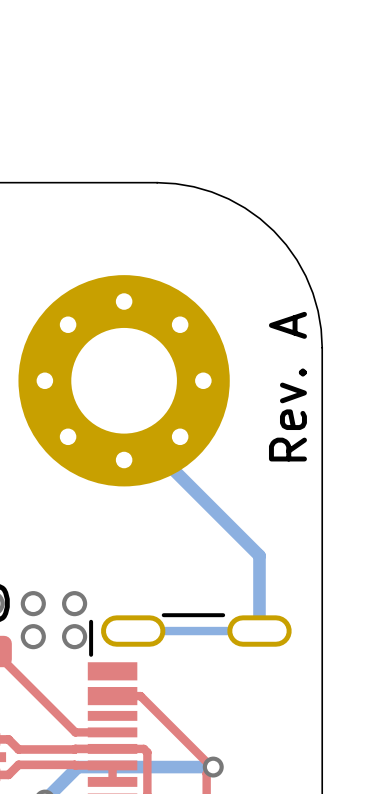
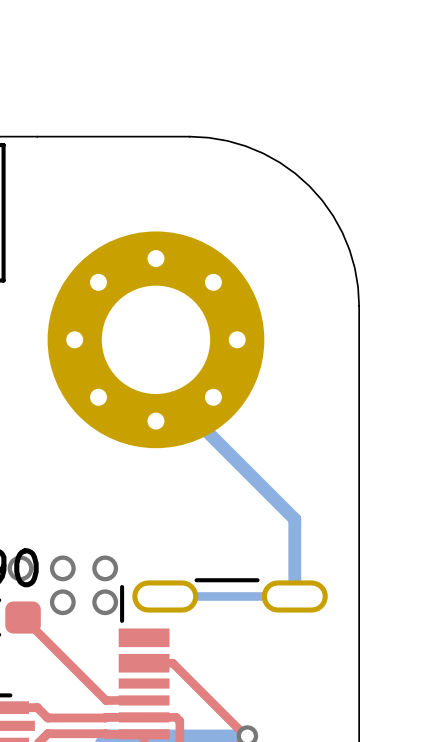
text: Rev. A (287, 386) -> none

